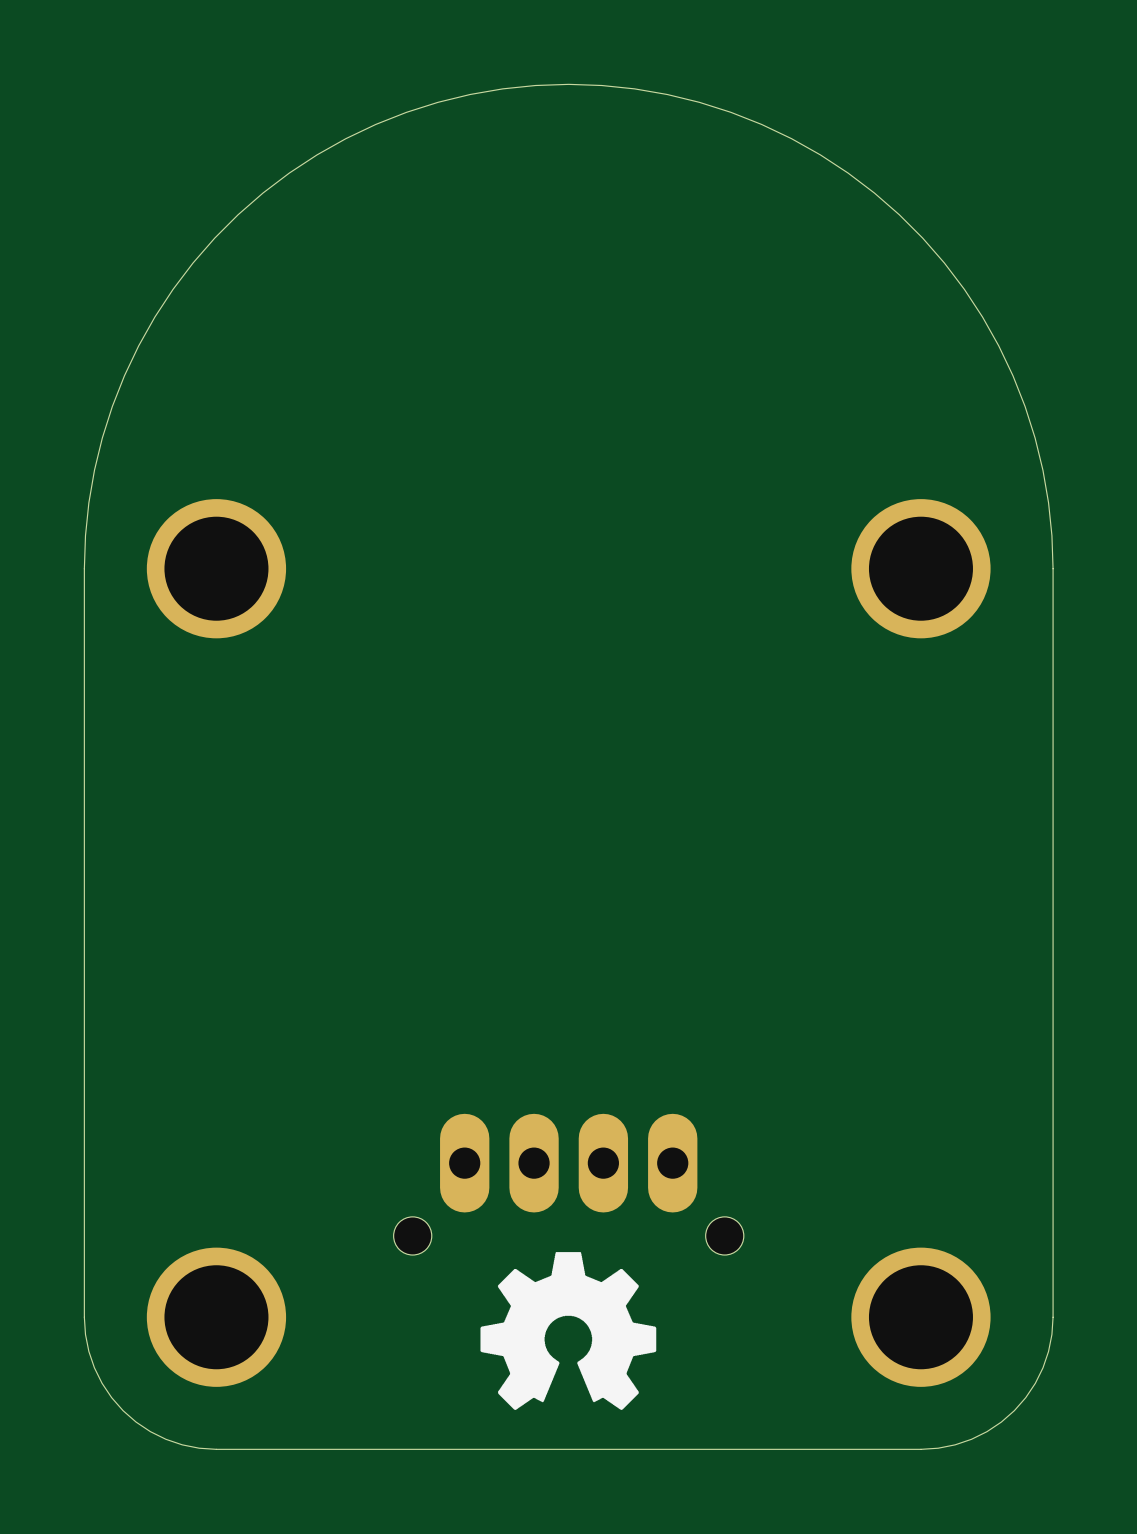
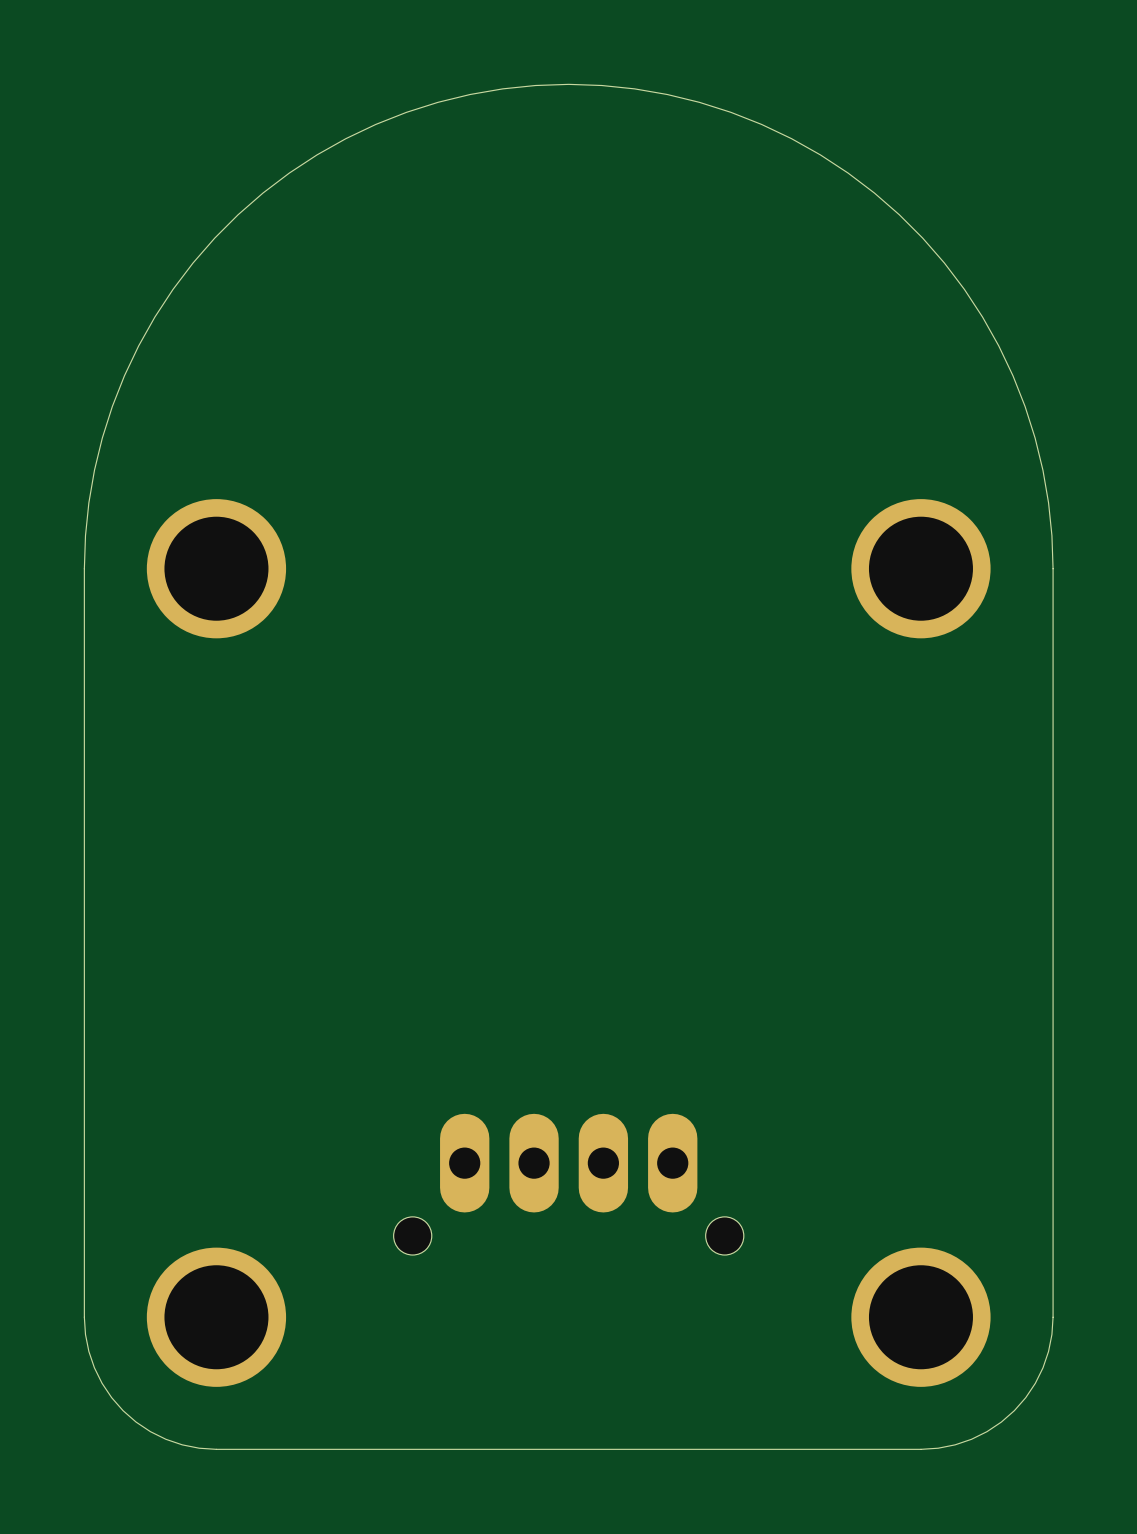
drawing: [480, 1252, 657, 1410] -> none

